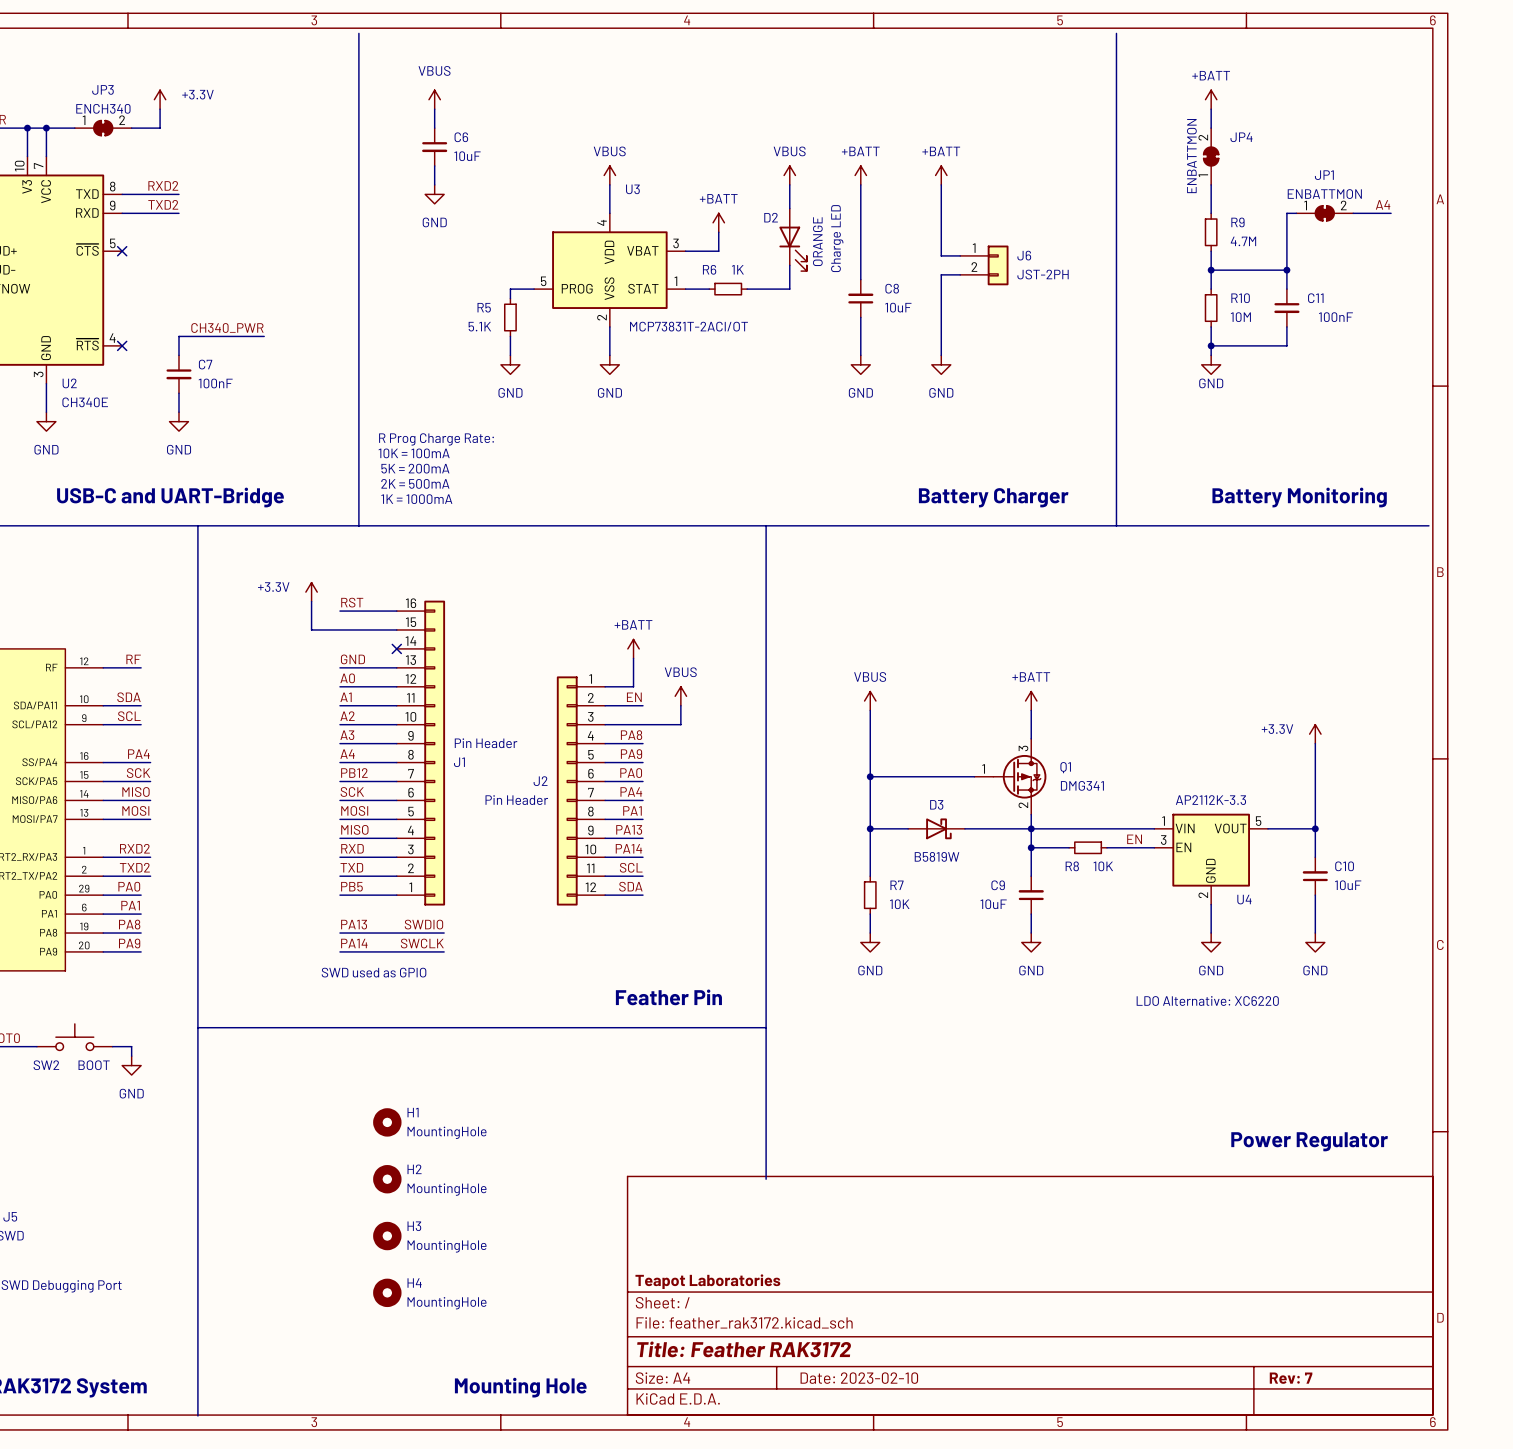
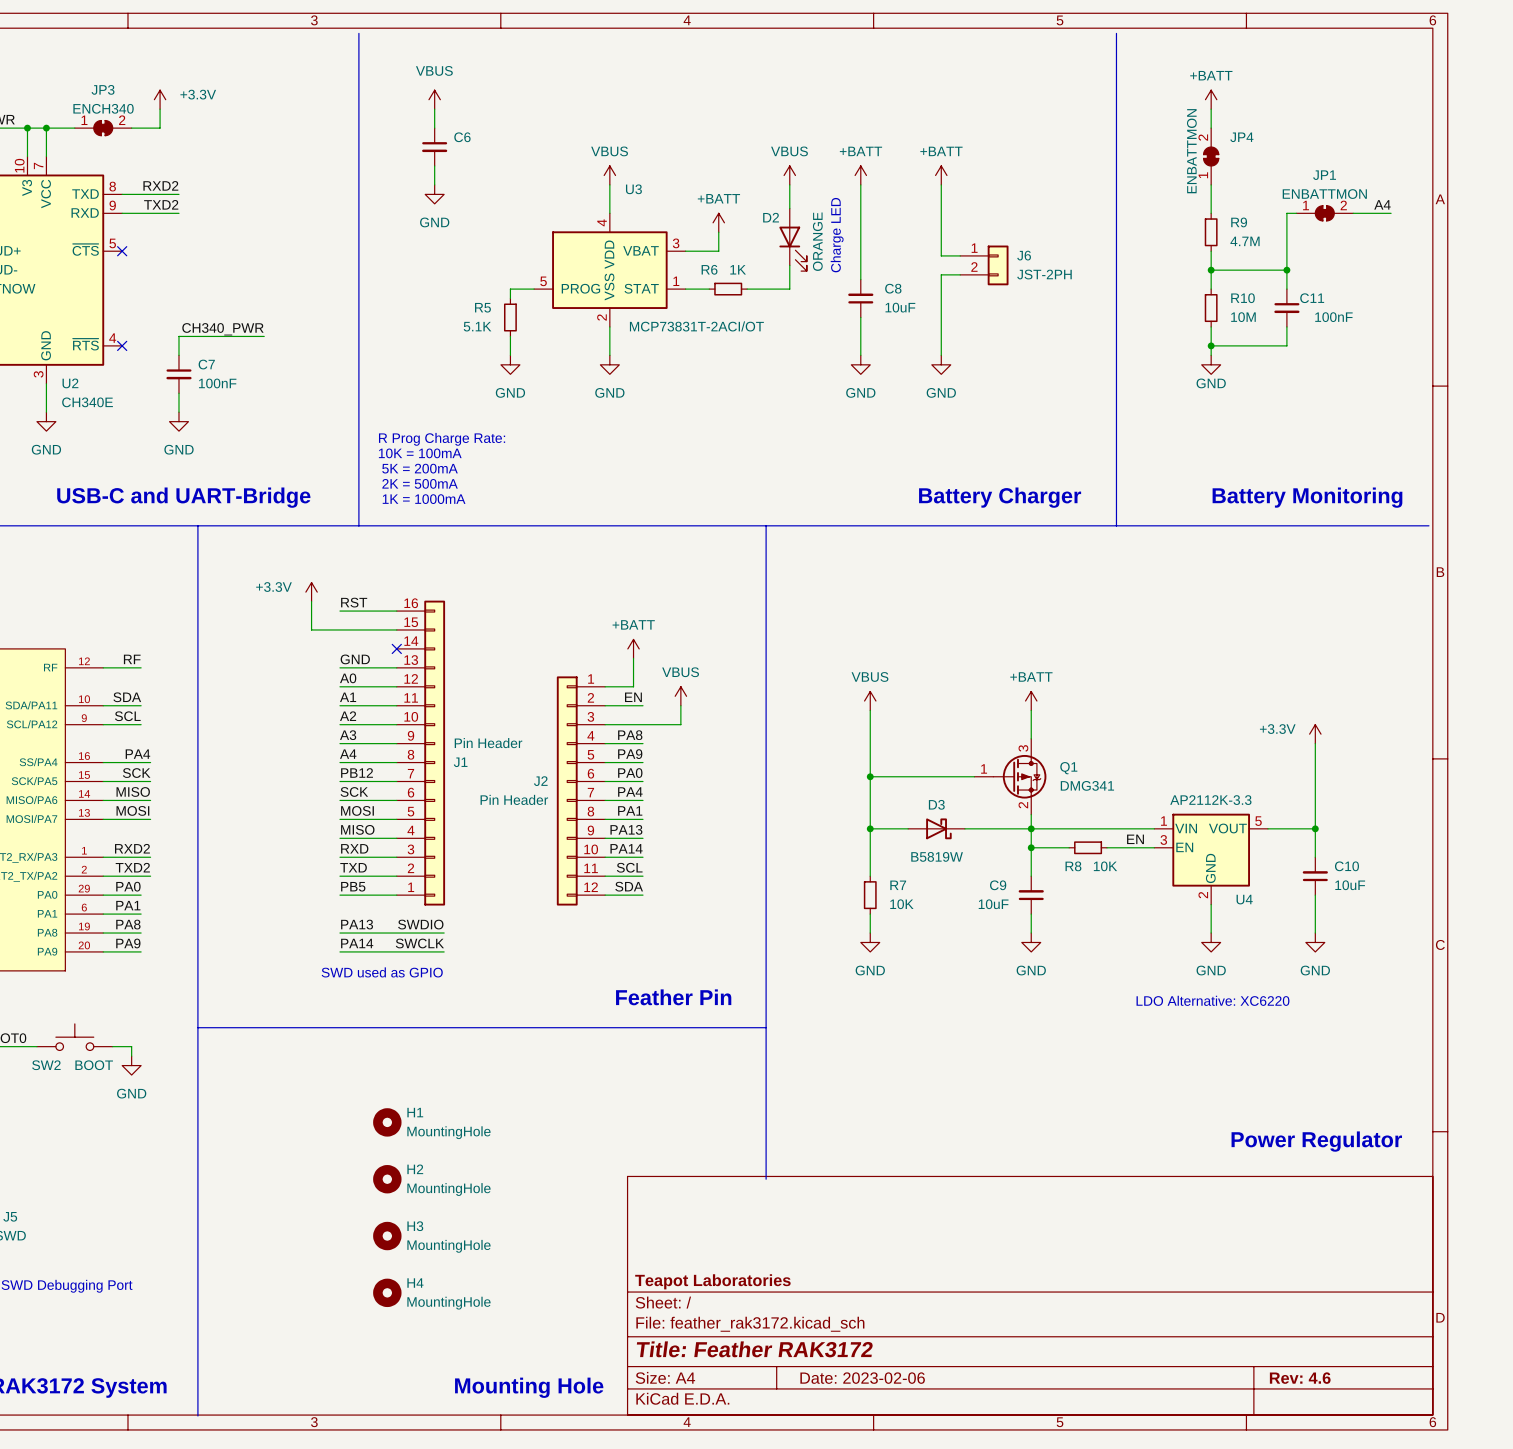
C6 value: 10uF (467, 156) -> none
title block: Date: 2023-02-10 (859, 1378) -> Date: 2023-02-06 (862, 1378)
title block: Rev: 7 (1291, 1378) -> Rev: 4.6 (1300, 1378)

